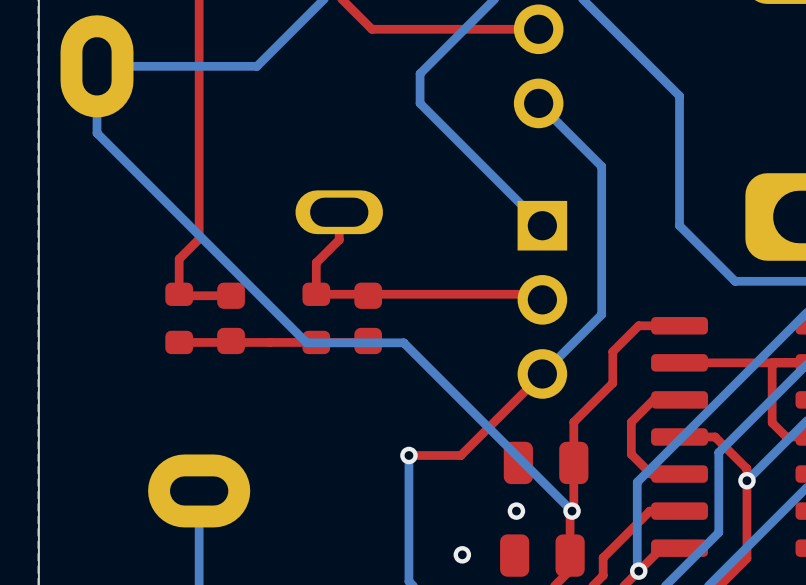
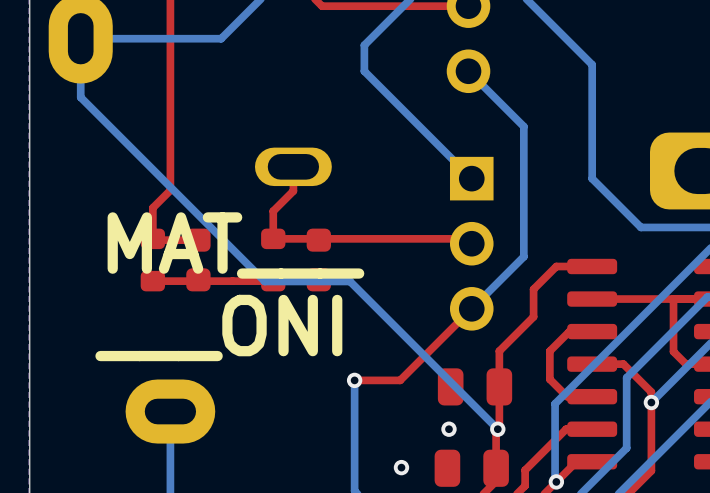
text: none -> MAT___ (235, 245)
text: none -> ___ONI (218, 327)

